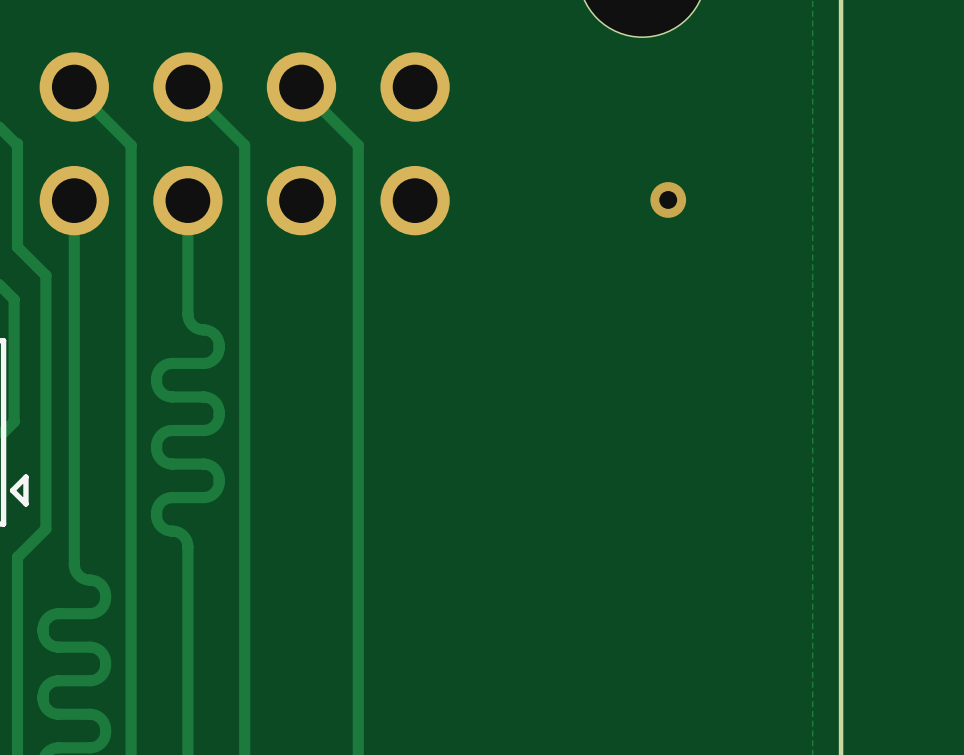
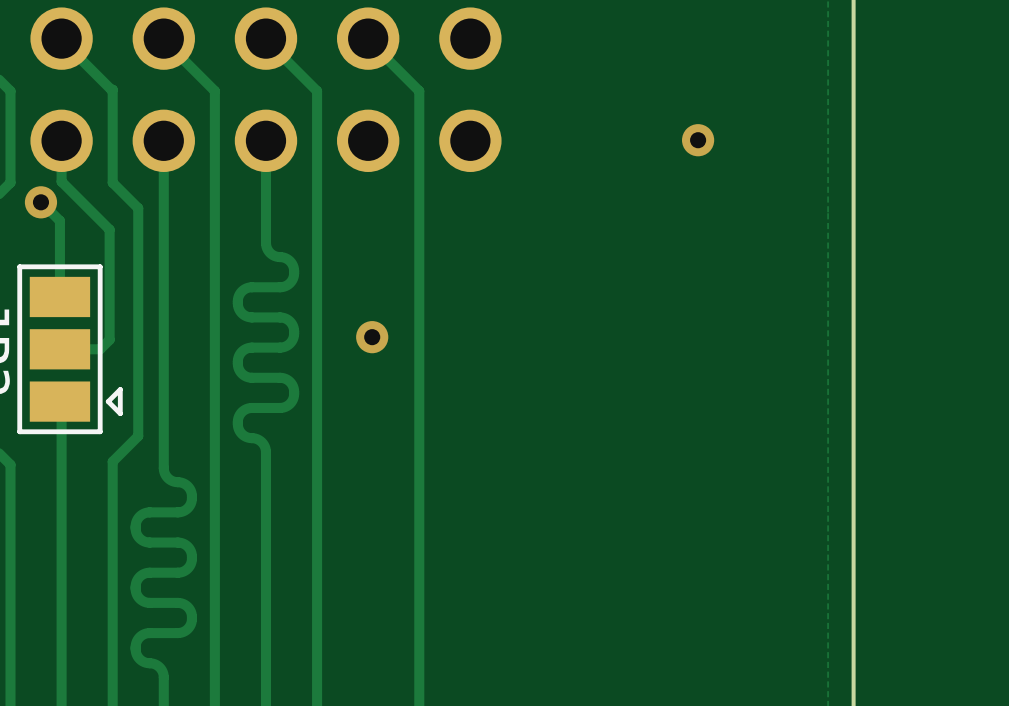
via: none -> (372, 337)

